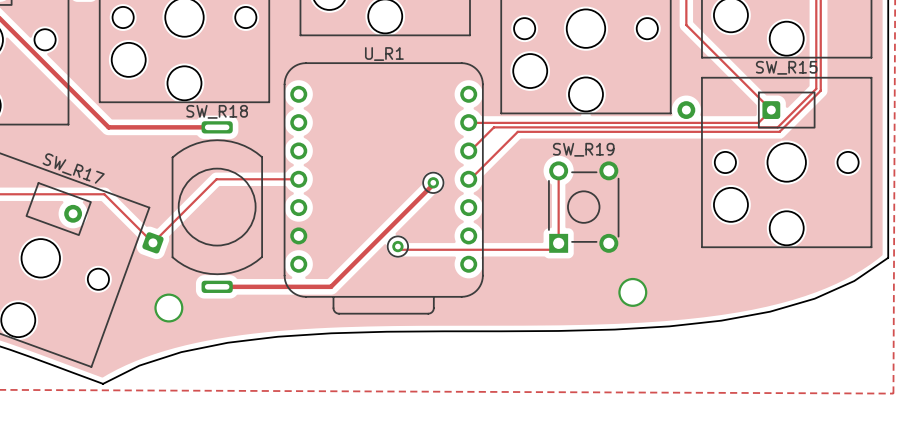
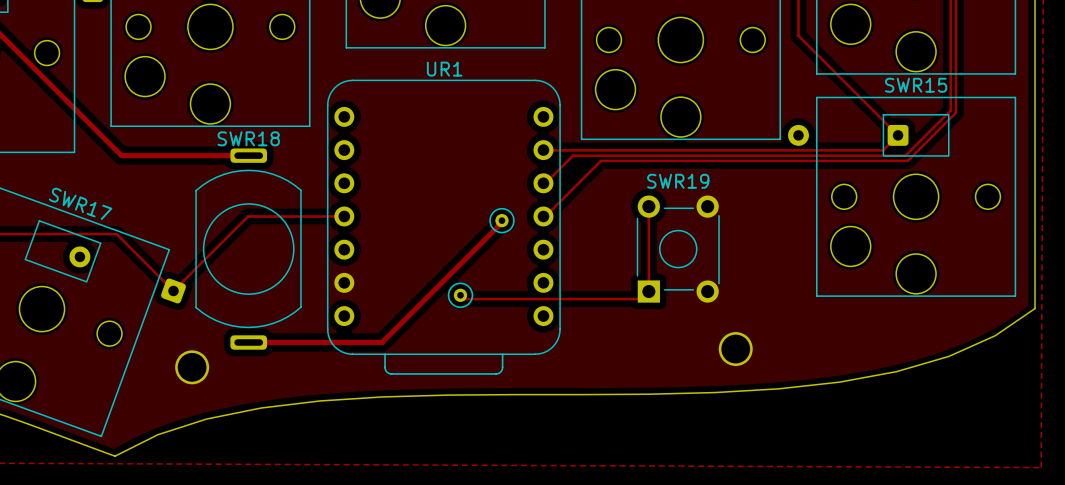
U_R1 name: U_R1 (384, 54) -> UR1 (444, 69)
SW_R15 name: SW_R15 (786, 67) -> SWR15 (916, 85)
SW_R19 name: SW_R19 (583, 149) -> SWR19 (678, 181)
SW_R17 name: SW_R17 (73, 168) -> SWR17 (80, 203)
SWR18: none -> (248, 249)
SW_R18: (217, 207) -> none

